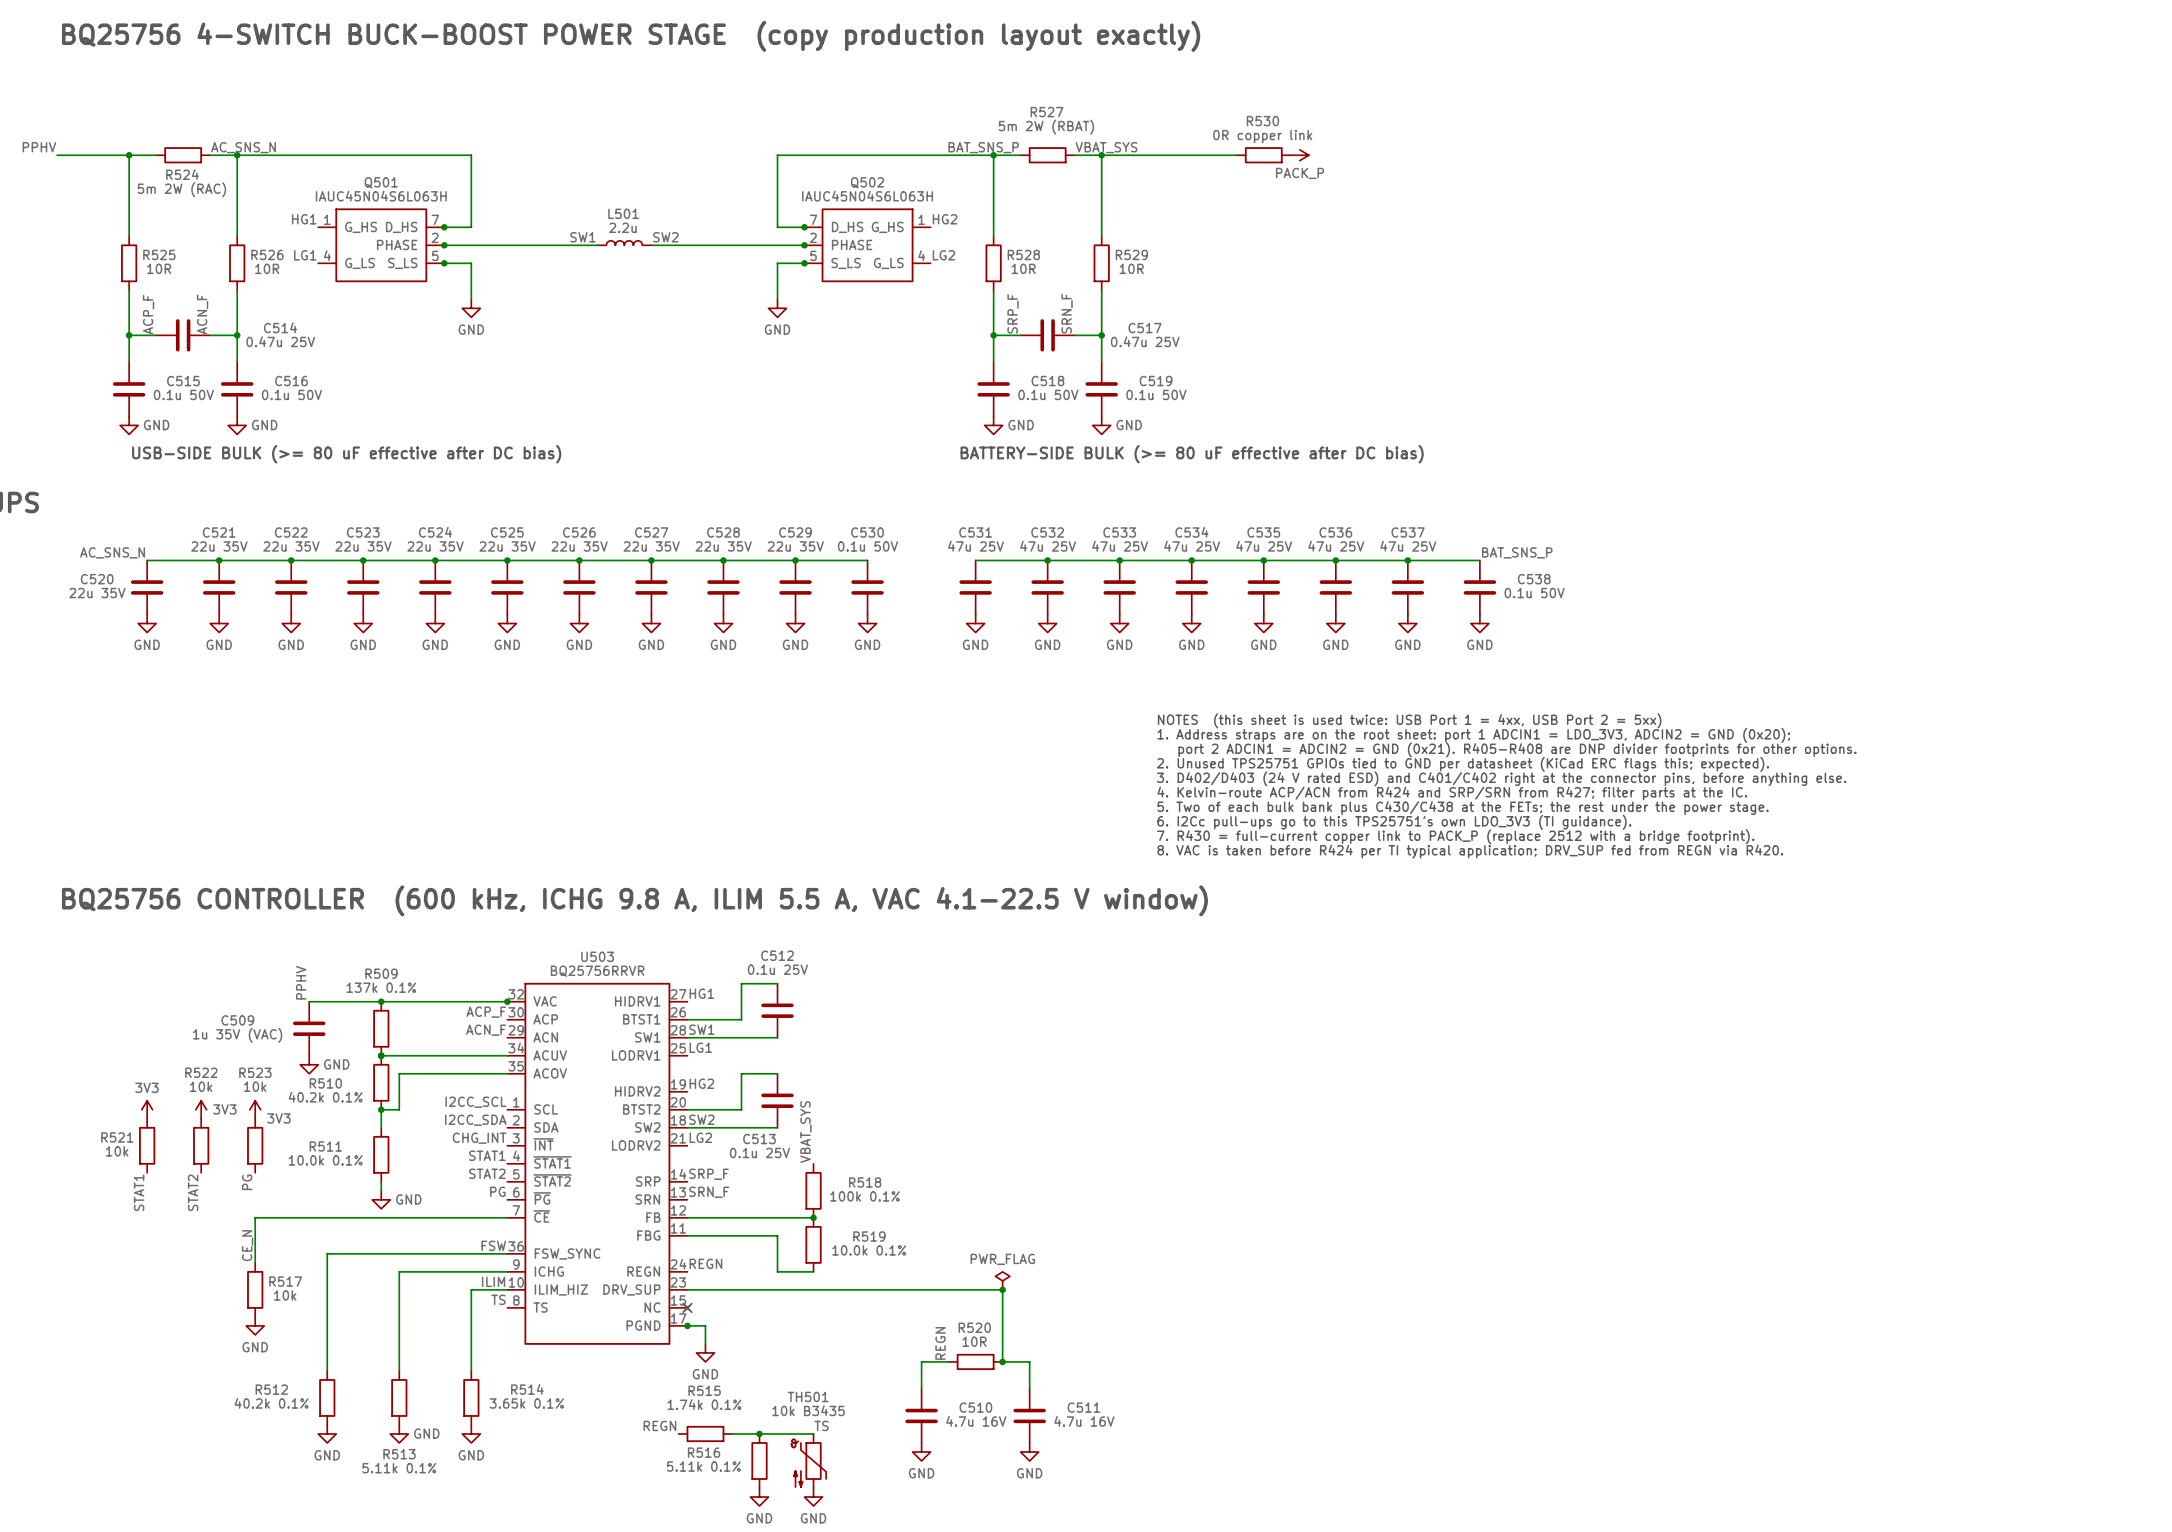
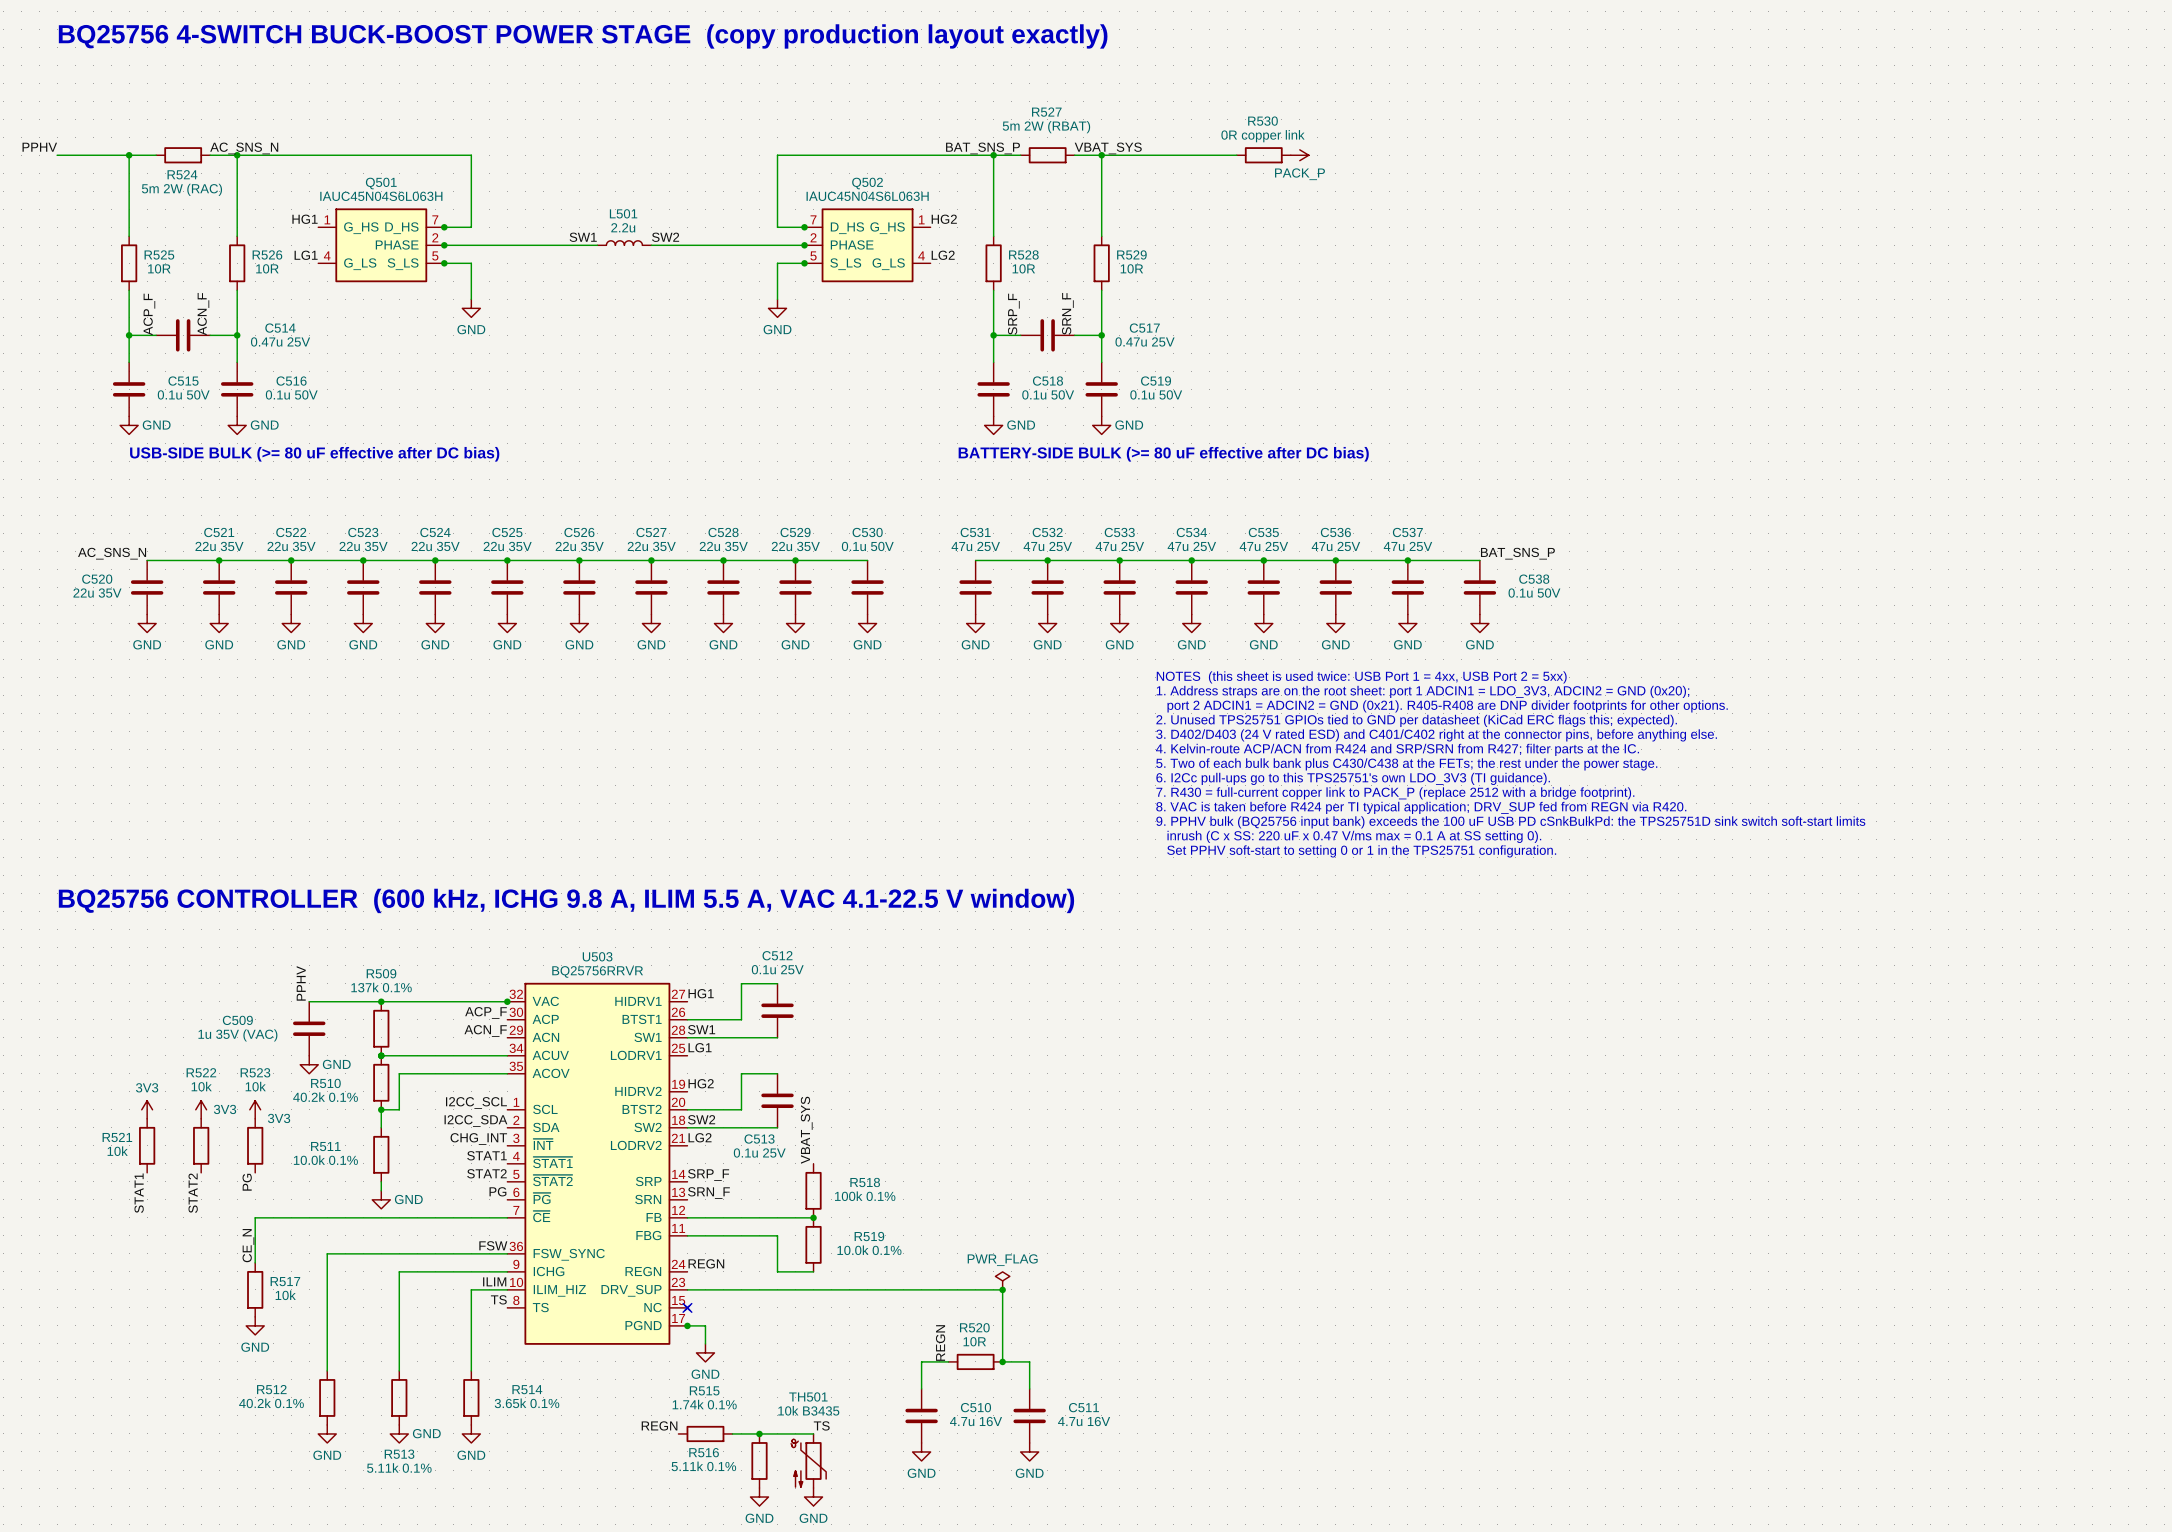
text: none -> NOTES (this sheet is used twice: USB Port 1 = 4xx, USB Port 2 = 5xx) (1361, 677)
text: none -> 1. Address straps are on the root sheet: port 1 ADCIN1 = LDO_3V3, ADCIN2 = GND (0x20); (1422, 691)
text: none -> port 2 ADCIN1 = ADCIN2 = GND (0x21). R405-R408 are DNP divider footprints for other options. (1447, 706)
text: NOTES (this sheet is used twice: USB Port 1 = 4xx, USB Port 2 = 5xx) (1409, 720) -> 2. Unused TPS25751 GPIOs tied to GND per datasheet (KiCad ERC flags this; expected). (1416, 720)
text: 1. Address straps are on the root sheet: port 1 ADCIN1 = LDO_3V3, ADCIN2 = GND (0x20); (1473, 735) -> 3. D402/D403 (24 V rated ESD) and C401/C402 right at the connector pins, before anything else. (1436, 735)
text: port 2 ADCIN1 = ADCIN2 = GND (0x21). R405-R408 are DNP divider footprints for other options. (1517, 749) -> 4. Kelvin-route ACP/ACN from R424 and SRP/SRN from R427; filter parts at the IC. (1397, 749)
text: 2. Unused TPS25751 GPIOs tied to GND per datasheet (KiCad ERC flags this; expected). (1463, 764) -> 5. Two of each bulk bank plus C430/C438 at the FETs; the rest under the power stage. (1406, 764)
text: 3. D402/D403 (24 V rated ESD) and C401/C402 right at the connector pins, before anything else. (1501, 778) -> 6. I2Cc pull-ups go to this TPS25751's own LDO_3V3 (TI guidance). (1353, 778)
text: 4. Kelvin-route ACP/ACN from R424 and SRP/SRN from R427; filter parts at the IC. (1452, 793) -> 7. R430 = full-current copper link to PACK_P (replace 2512 with a bridge footprint). (1395, 793)
text: 5. Two of each bulk bank plus C430/C438 at the FETs; the rest under the power stage. (1463, 808) -> 8. VAC is taken before R424 per TI typical application; DRV_SUP fed from REGN via R420. (1421, 807)
text: 6. I2Cc pull-ups go to this TPS25751's own LDO_3V3 (TI guidance). (1394, 822) -> 9. PPHV bulk (BQ25756 input bank) exceeds the 100 uF USB PD cSnkBulkPd: the TPS25751D sink switch soft-start limits (1510, 822)
text: 7. R430 = full-current copper link to PACK_P (replace 2512 with a bridge footprint). (1455, 836) -> inrush (C x SS: 220 uF x 0.47 V/ms max = 0.1 A at SS setting 0). (1354, 836)
text: 8. VAC is taken before R424 per TI typical application; DRV_SUP fed from REGN via R420. (1470, 851) -> Set PPHV soft-start to setting 0 or 1 in the TPS25751 configuration. (1361, 851)

